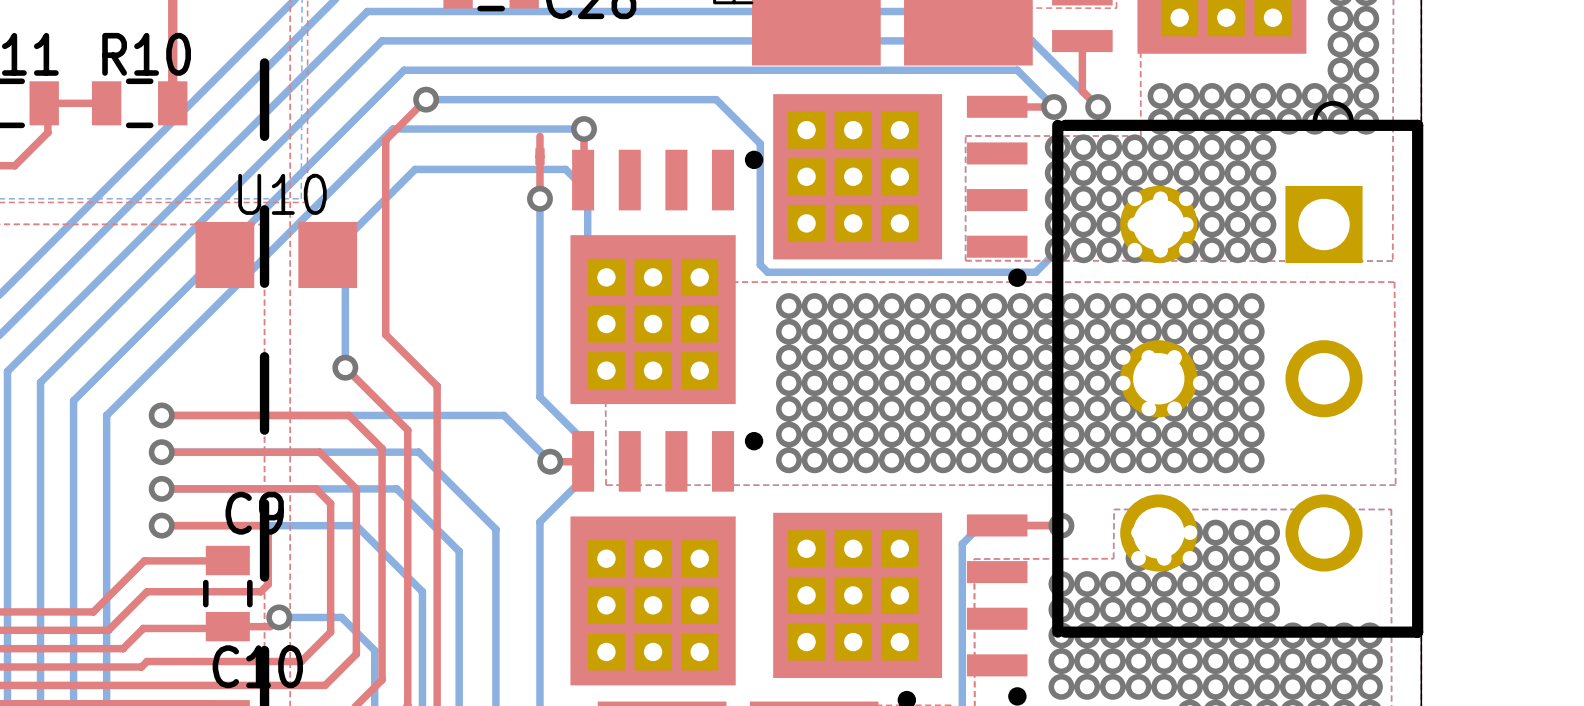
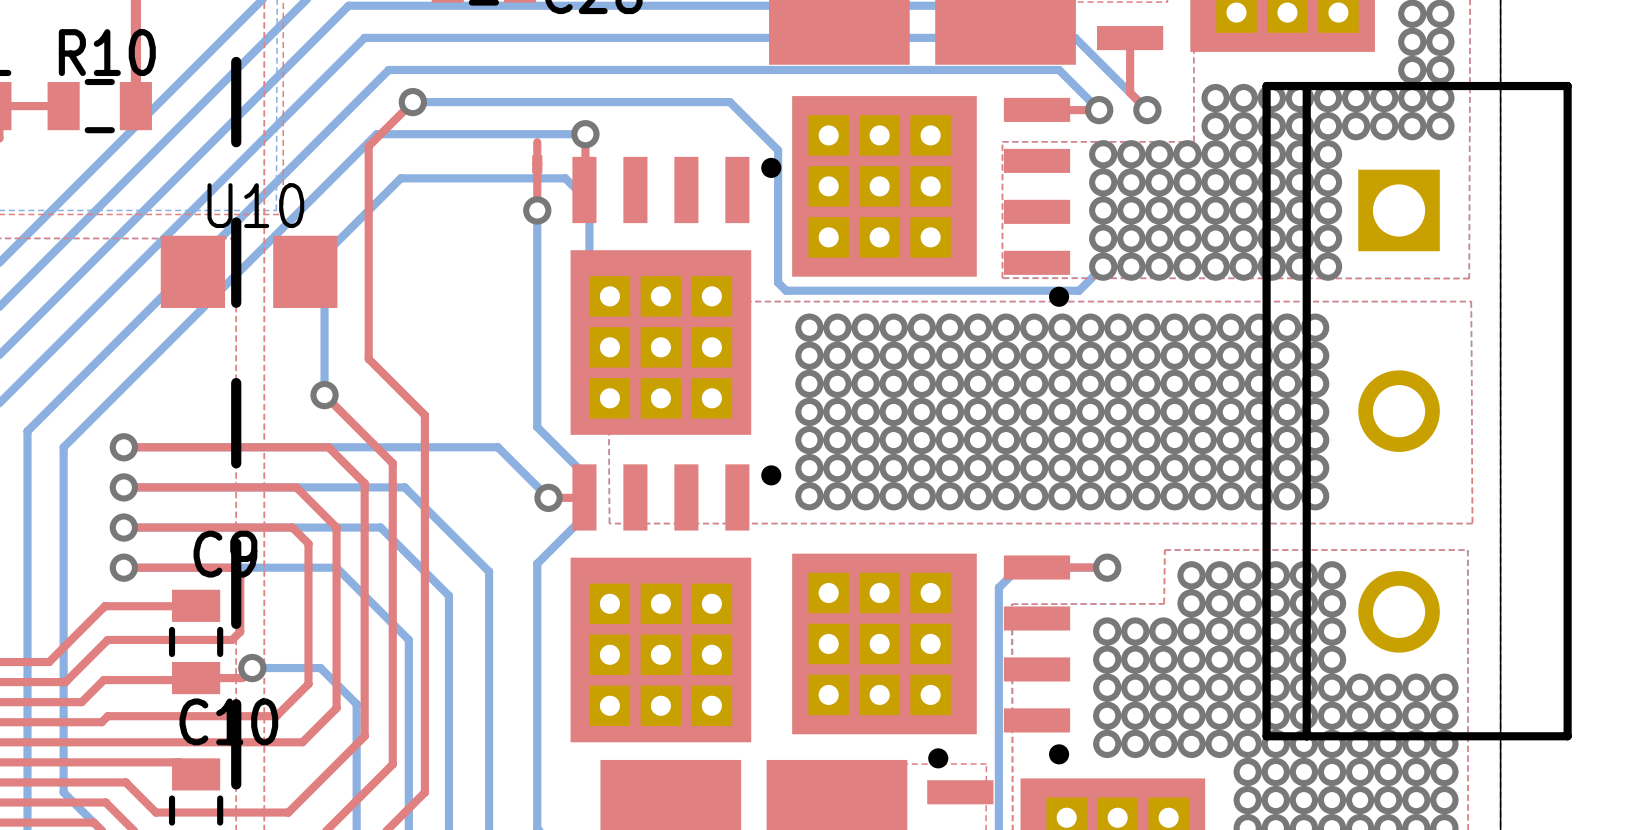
part: (1237, 369) -> none
part: none -> (1417, 411)

